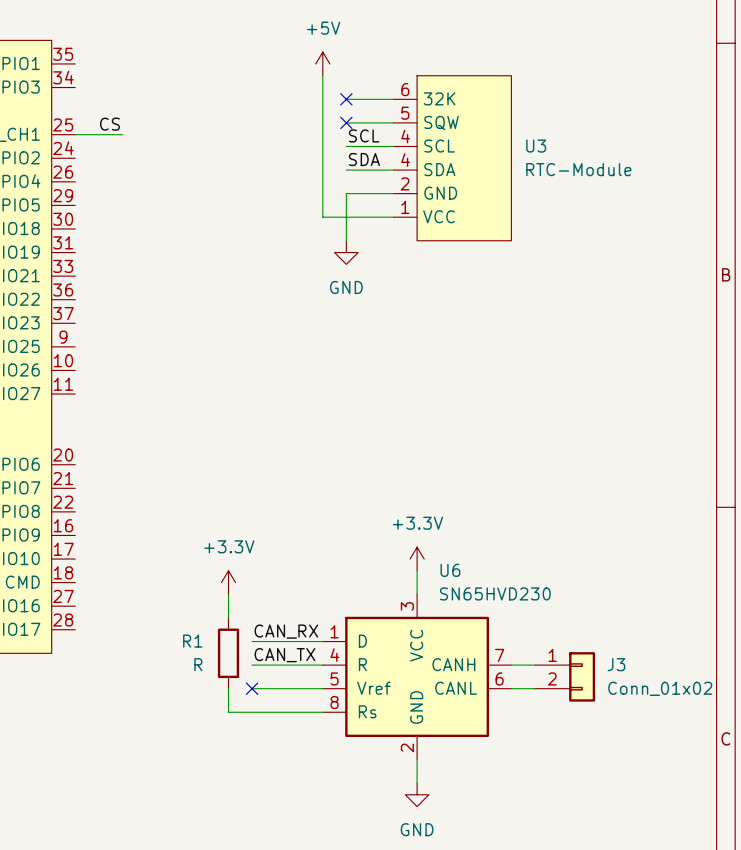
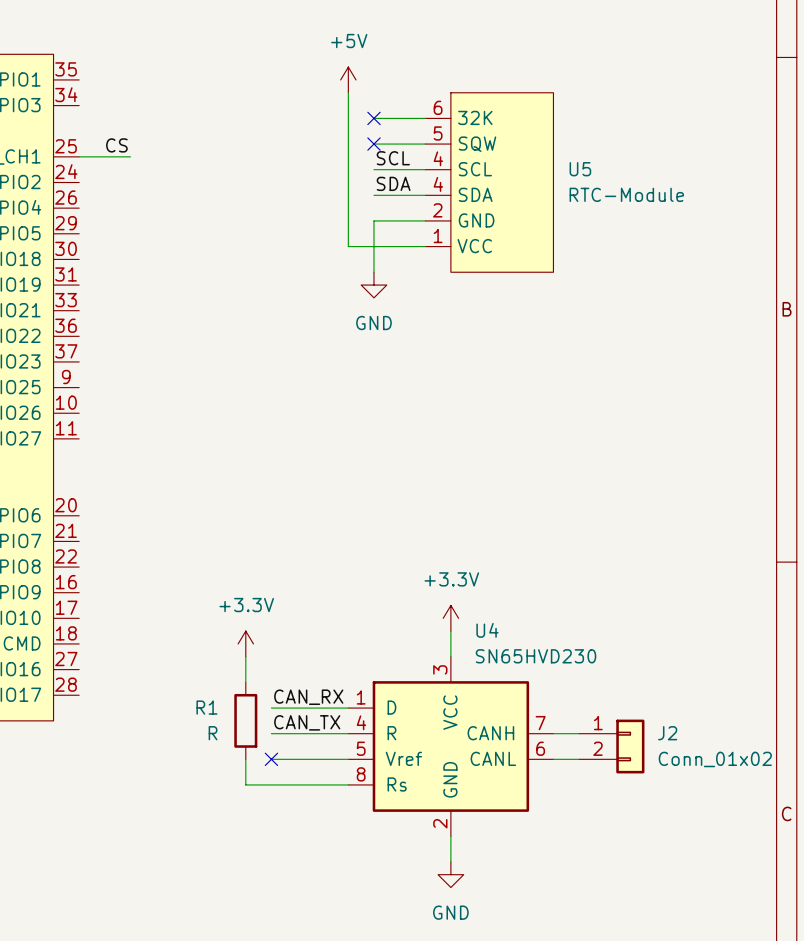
U3 name: U3 (536, 146) -> U5 (580, 169)
U6 name: U6 (450, 570) -> U4 (487, 630)
J3 name: J3 (616, 664) -> J2 (667, 733)

